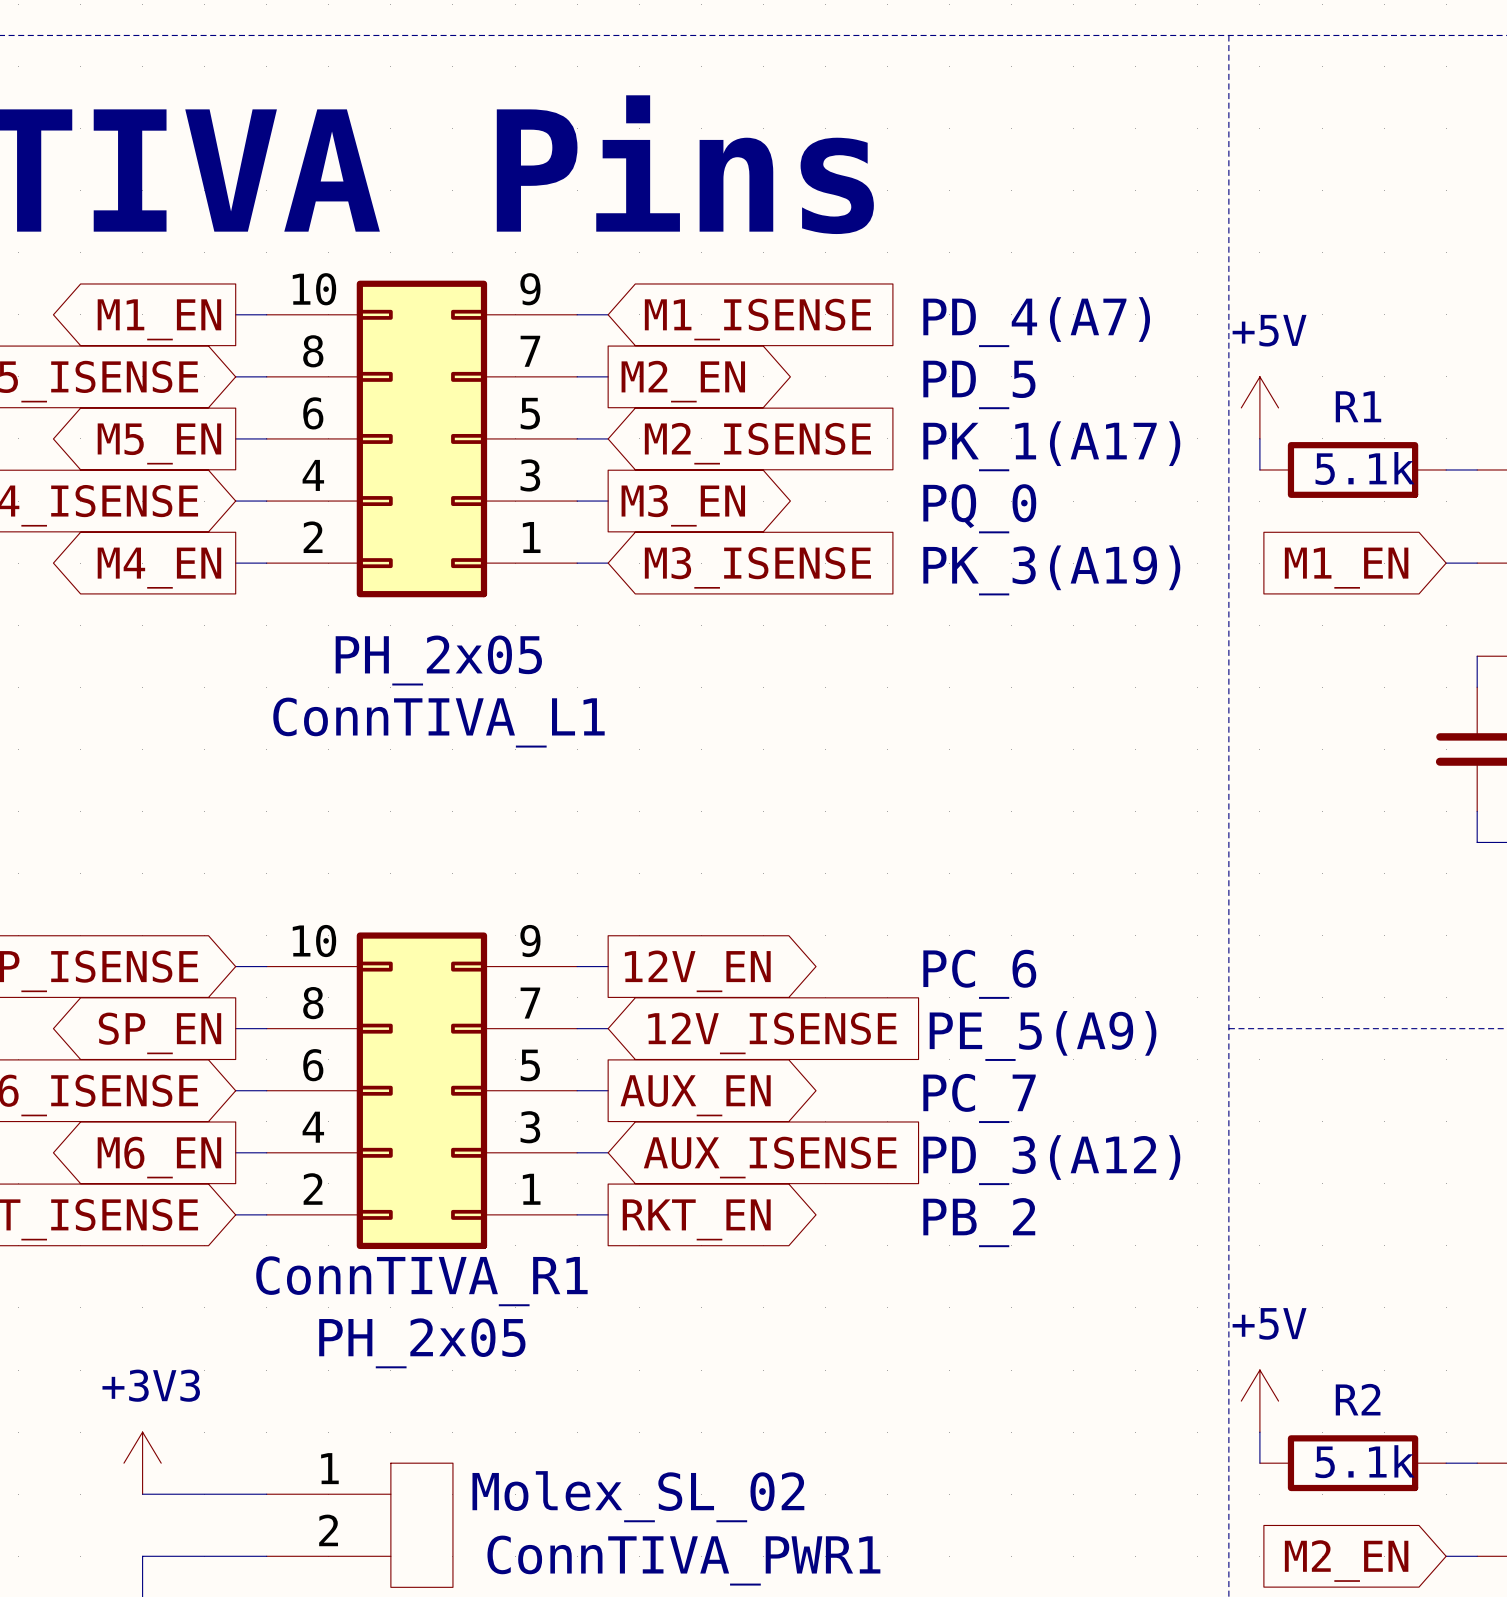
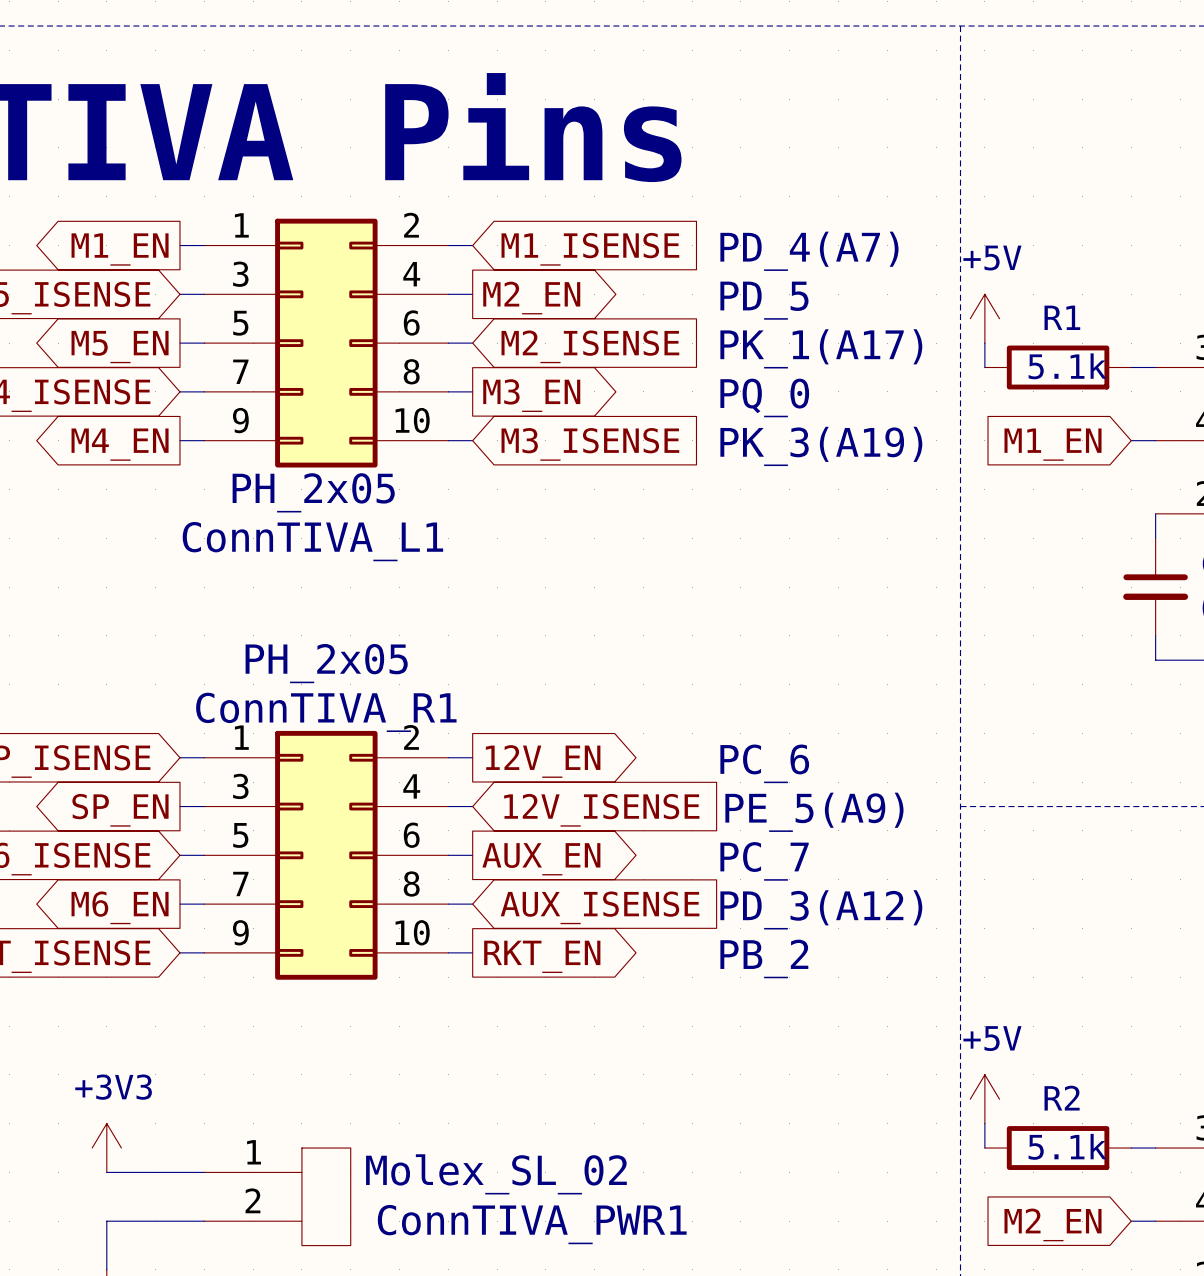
ConnTIVA_L1 rotation: 0° (421, 438) -> 180° (326, 343)
ConnTIVA_L1 name position: ConnTIVA_L1 (438, 722) -> ConnTIVA_L1 (312, 541)
ConnTIVA_R1 rotation: 0° (421, 1090) -> 180° (326, 855)

